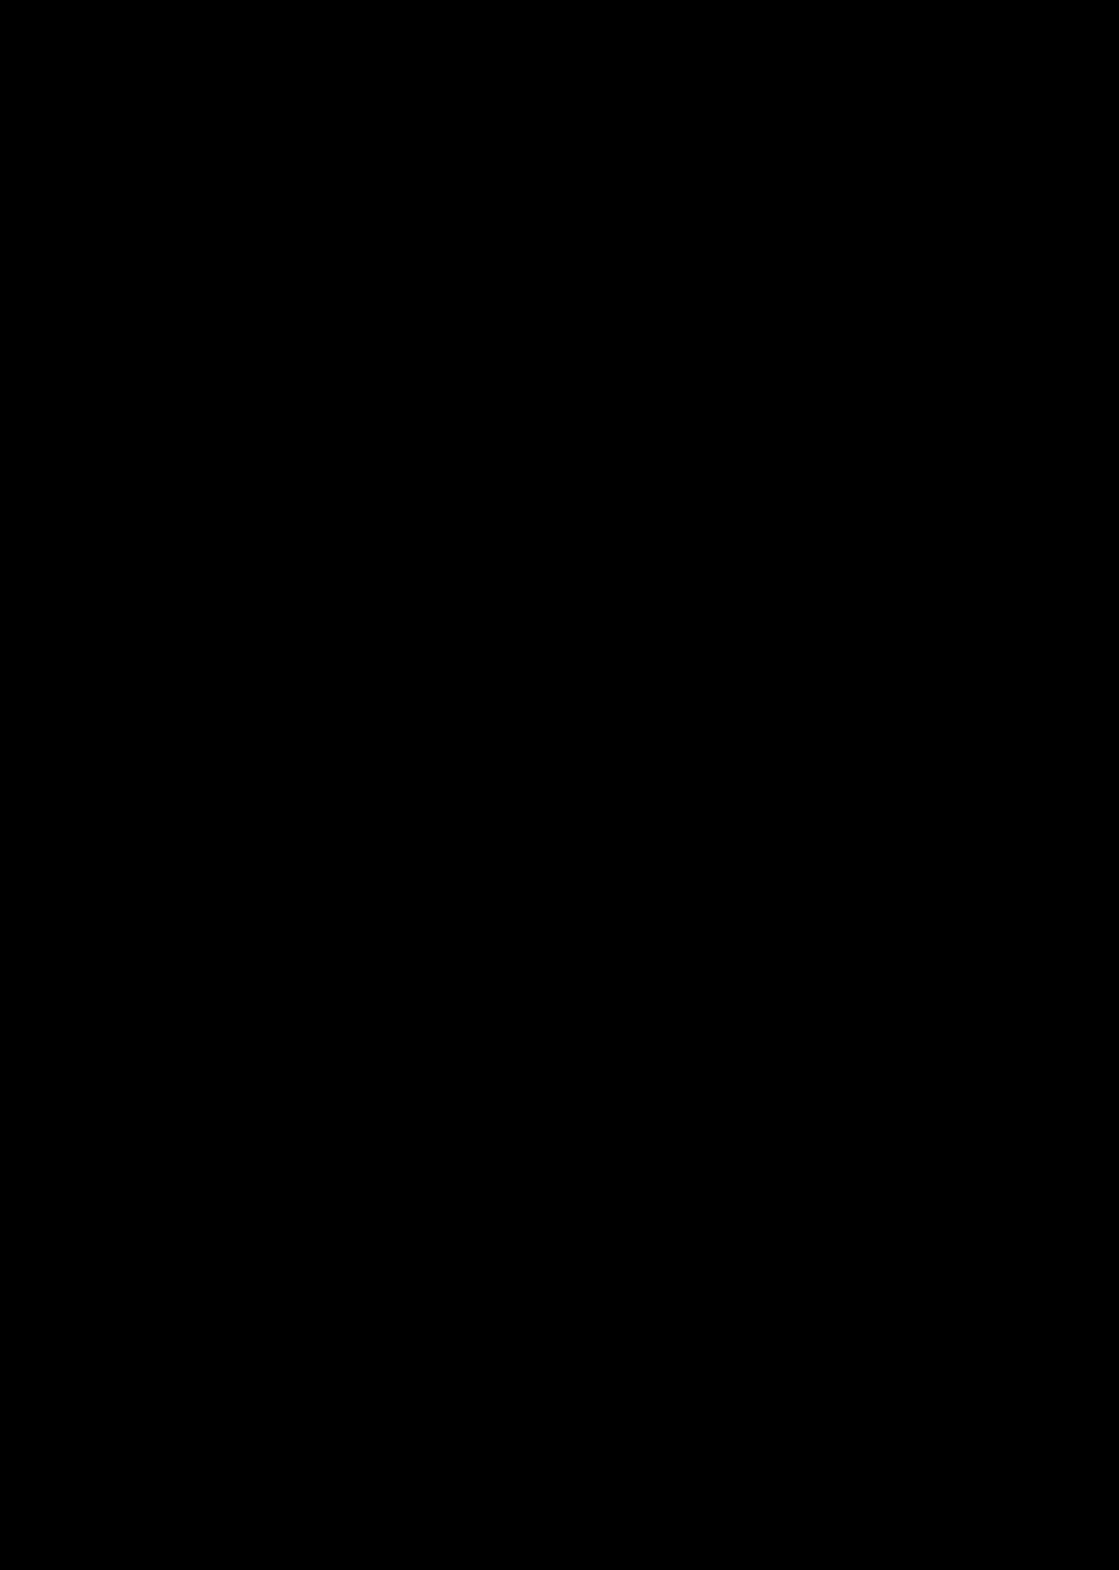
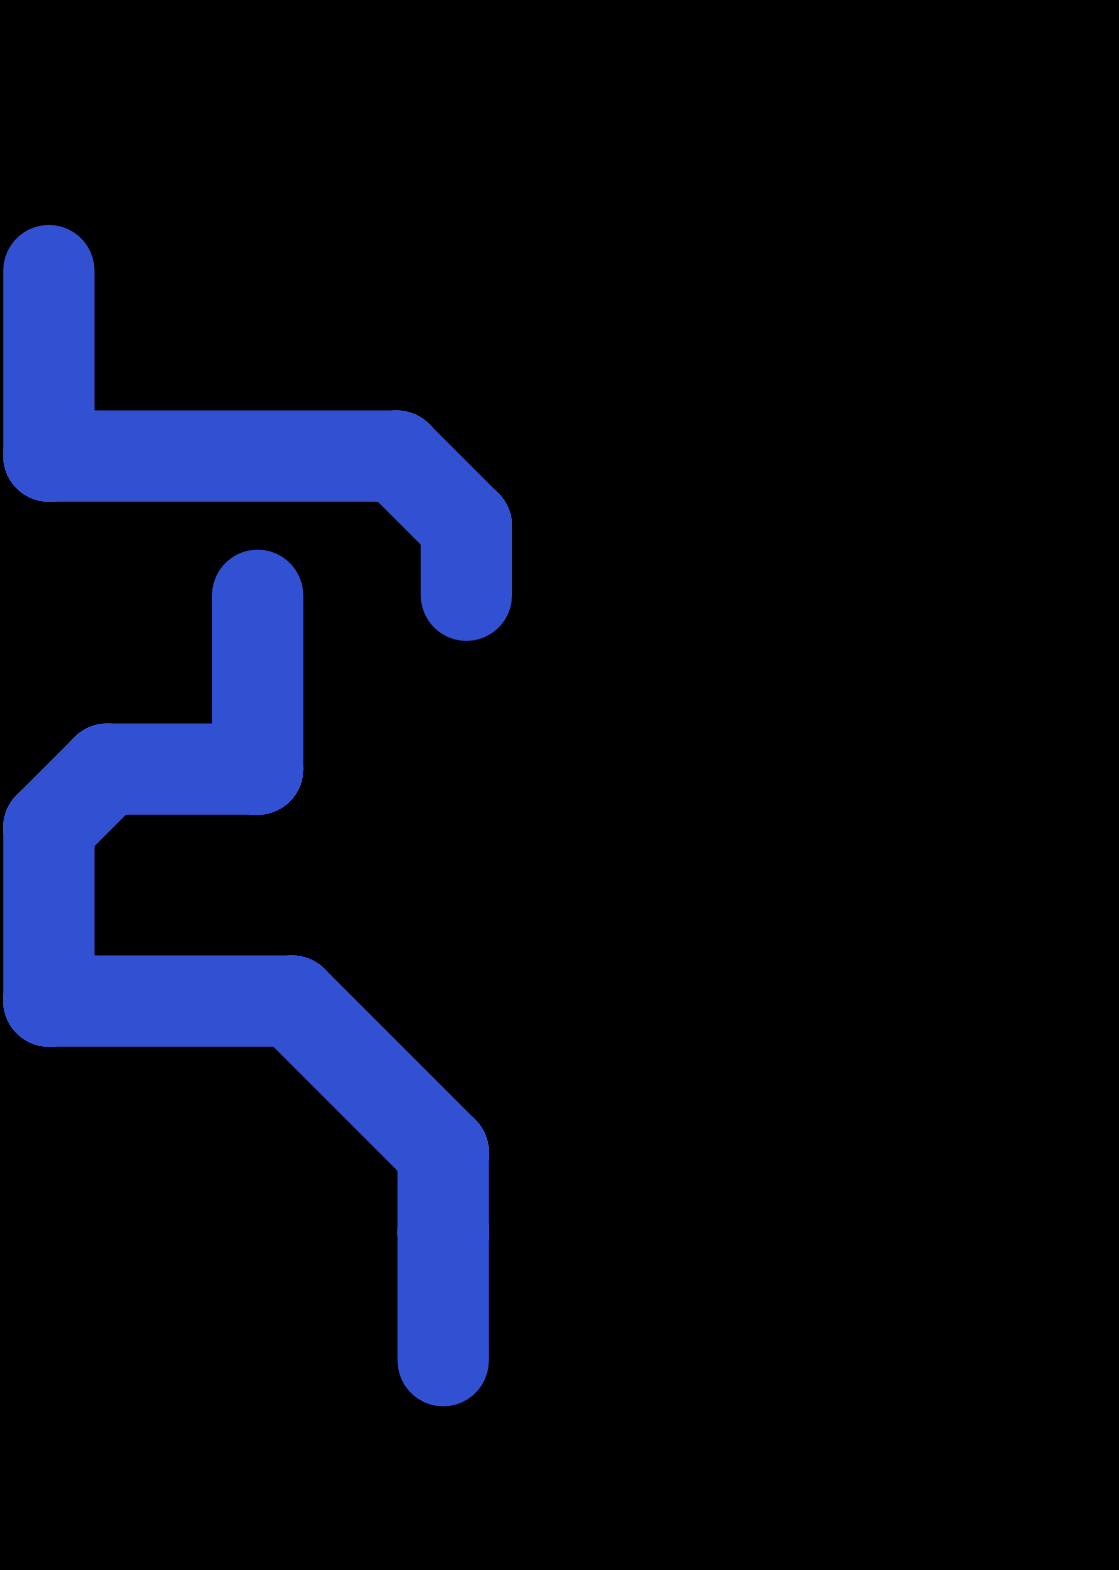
bottom track: none -> (48, 270) (48, 456) (396, 456) (466, 525) (466, 595)
bottom track: none -> (257, 595) (257, 769) (106, 769) (48, 827) (48, 1001) (292, 1001) (443, 1151) (443, 1360)

